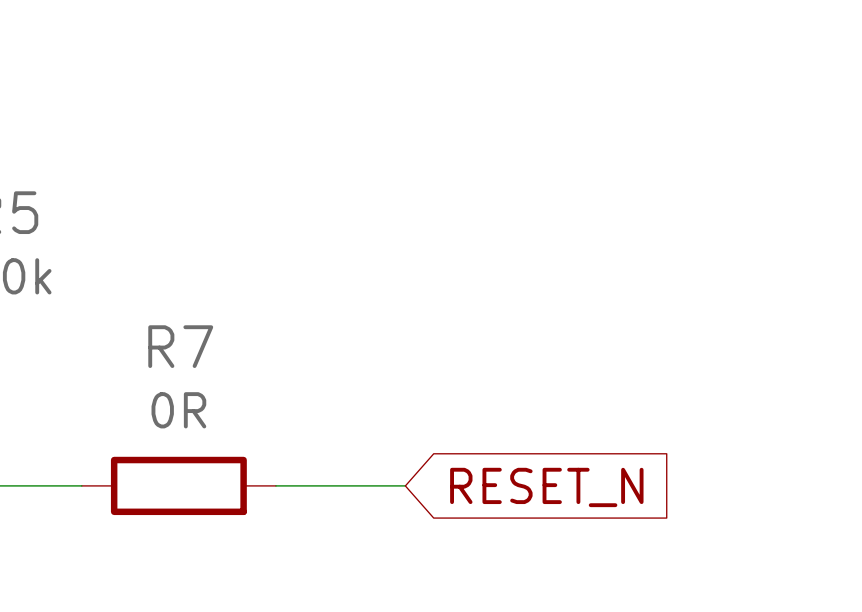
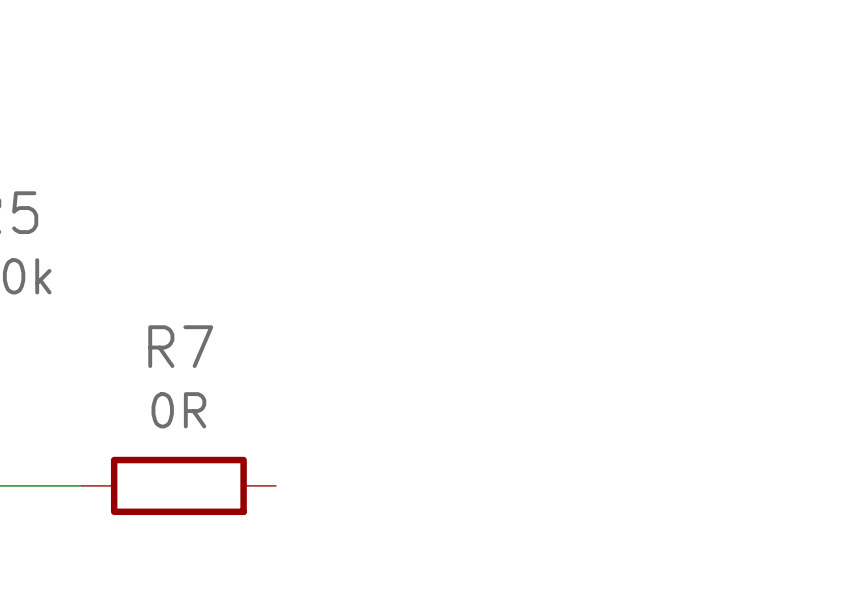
wire: (275, 485) (405, 485) -> none
global label: RESET_N (546, 487) -> none

